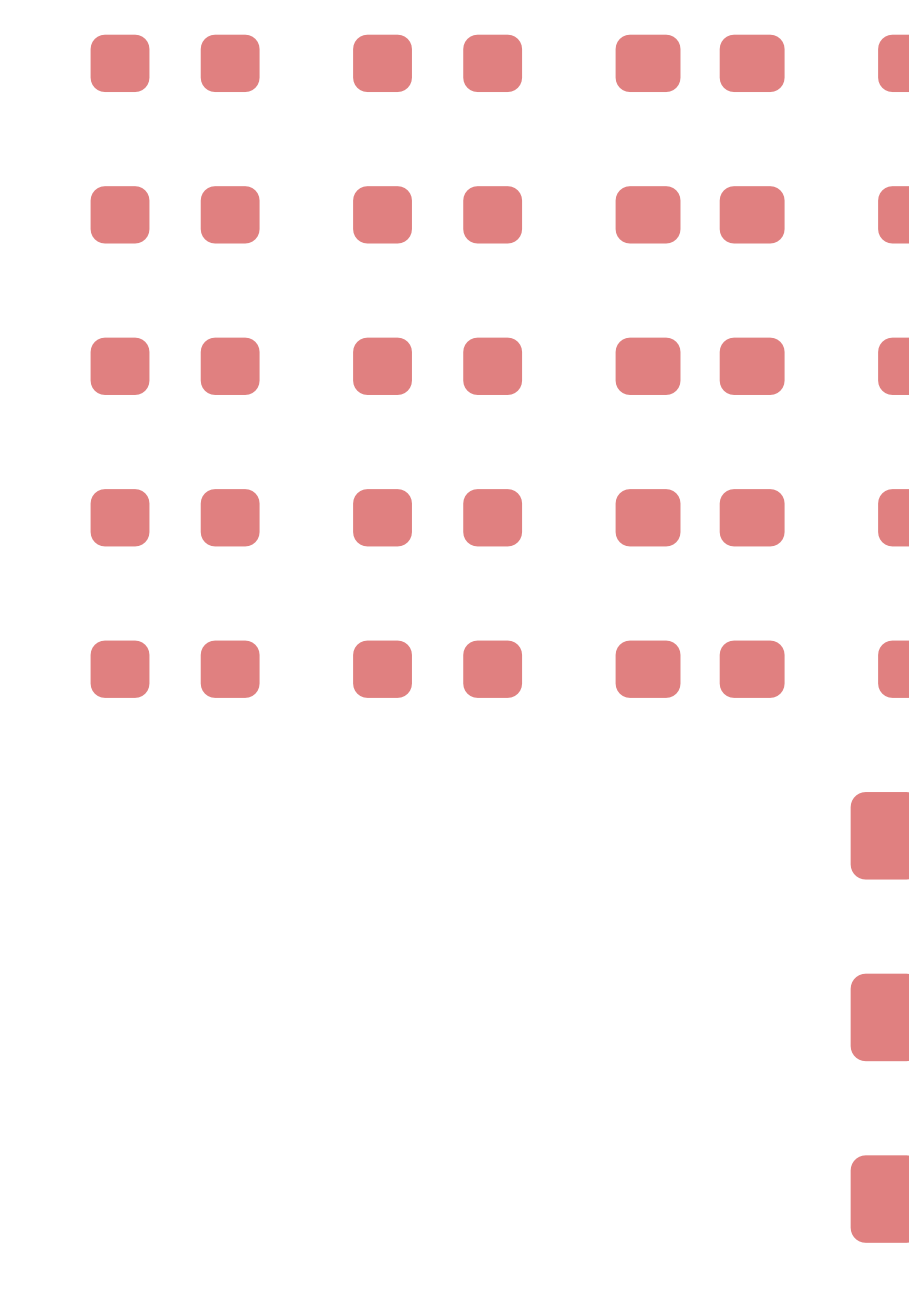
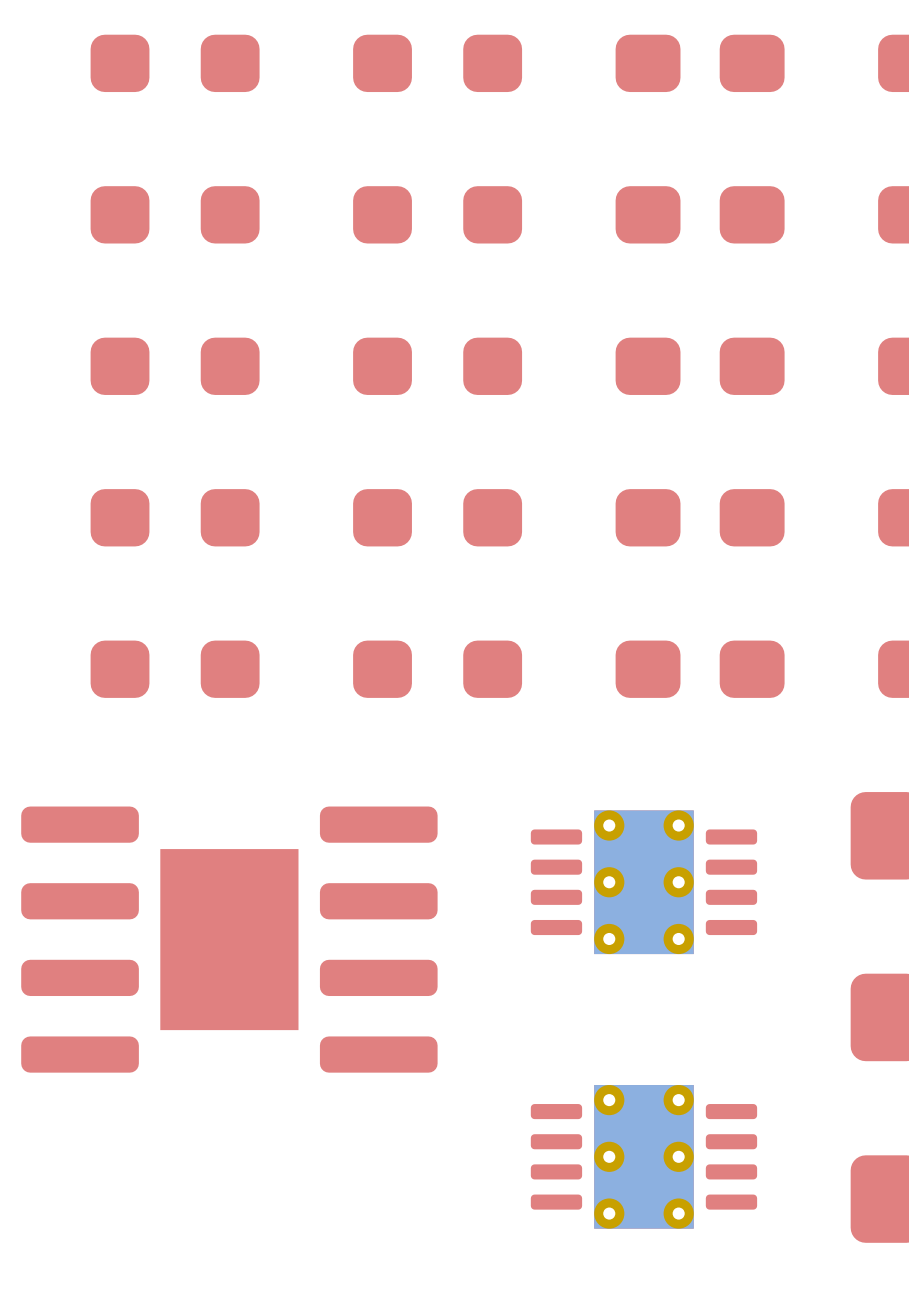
part: none -> (643, 882)
part: none -> (229, 939)
part: none -> (643, 1156)

